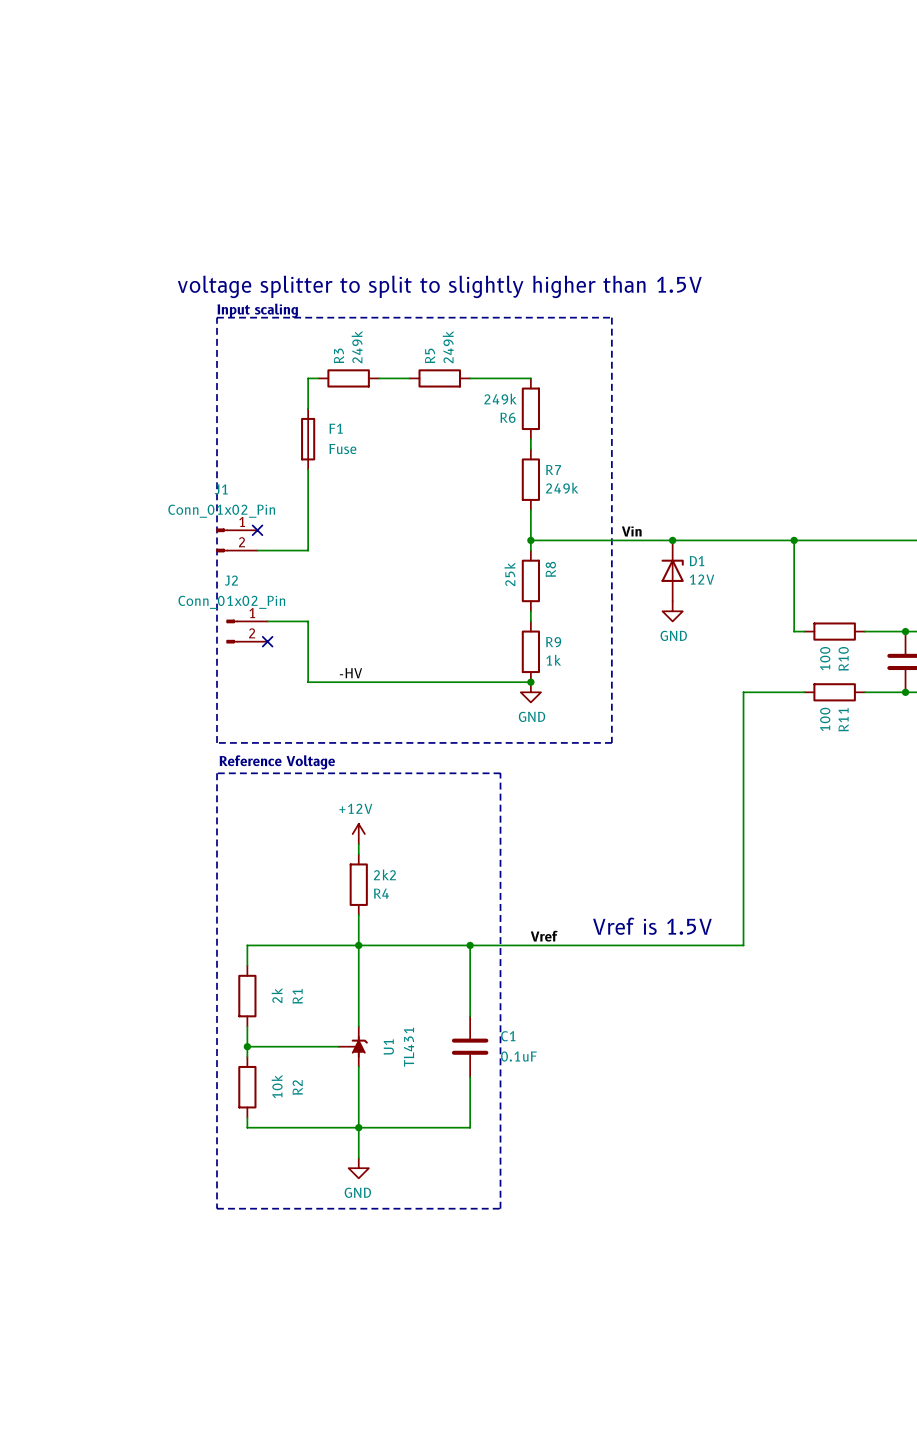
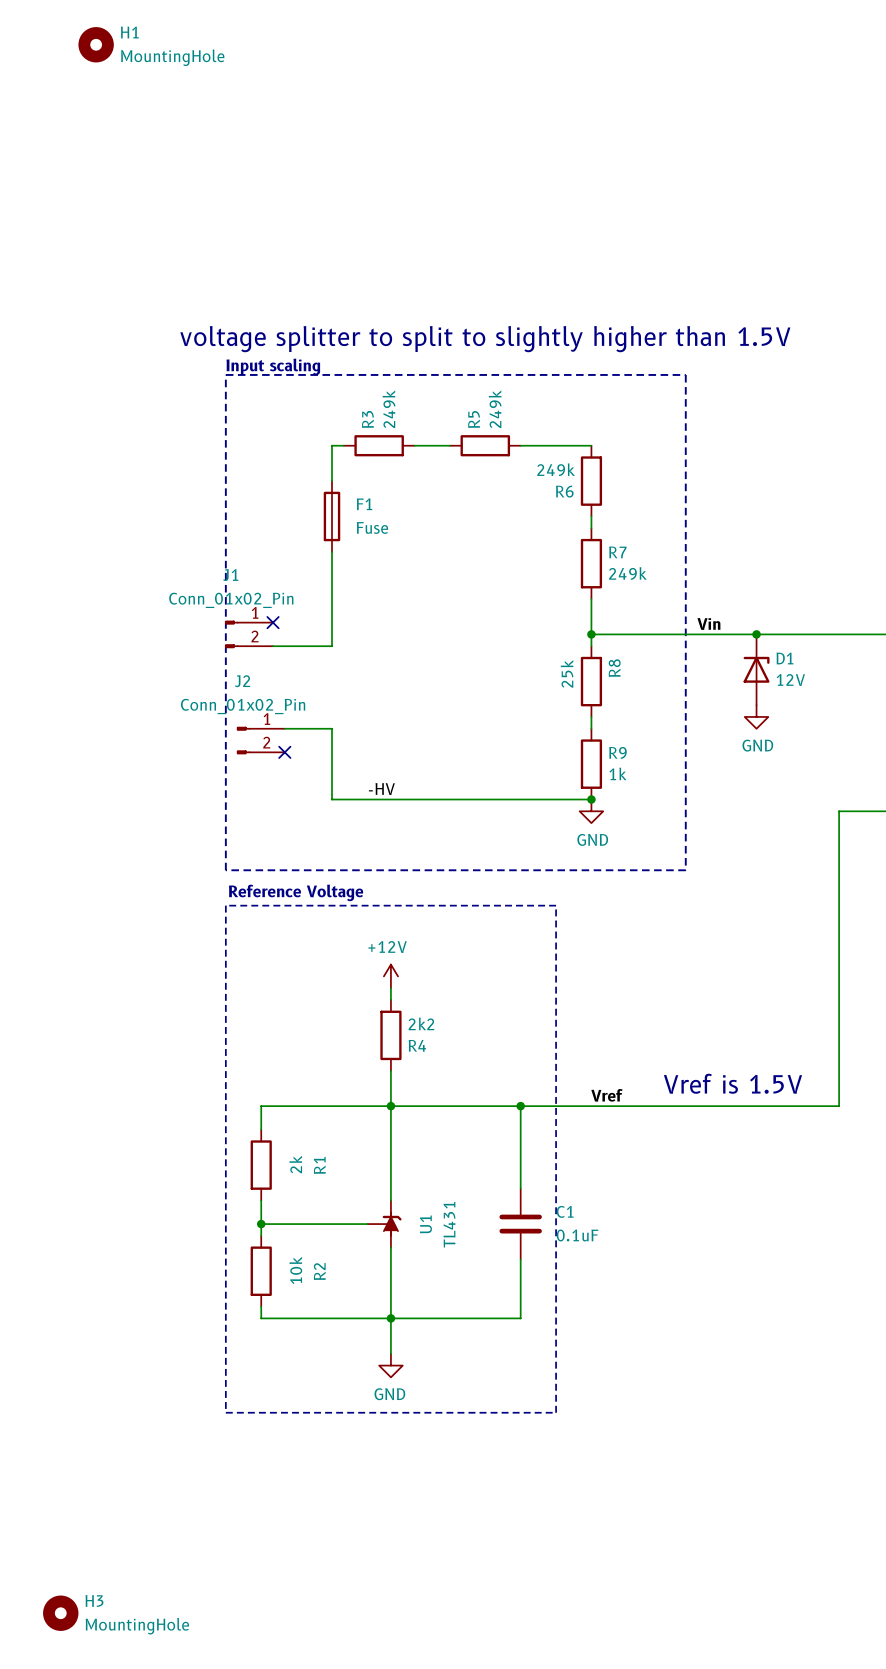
H1: none -> MountingHole (96, 44)
H3: none -> MountingHole (60, 1613)

